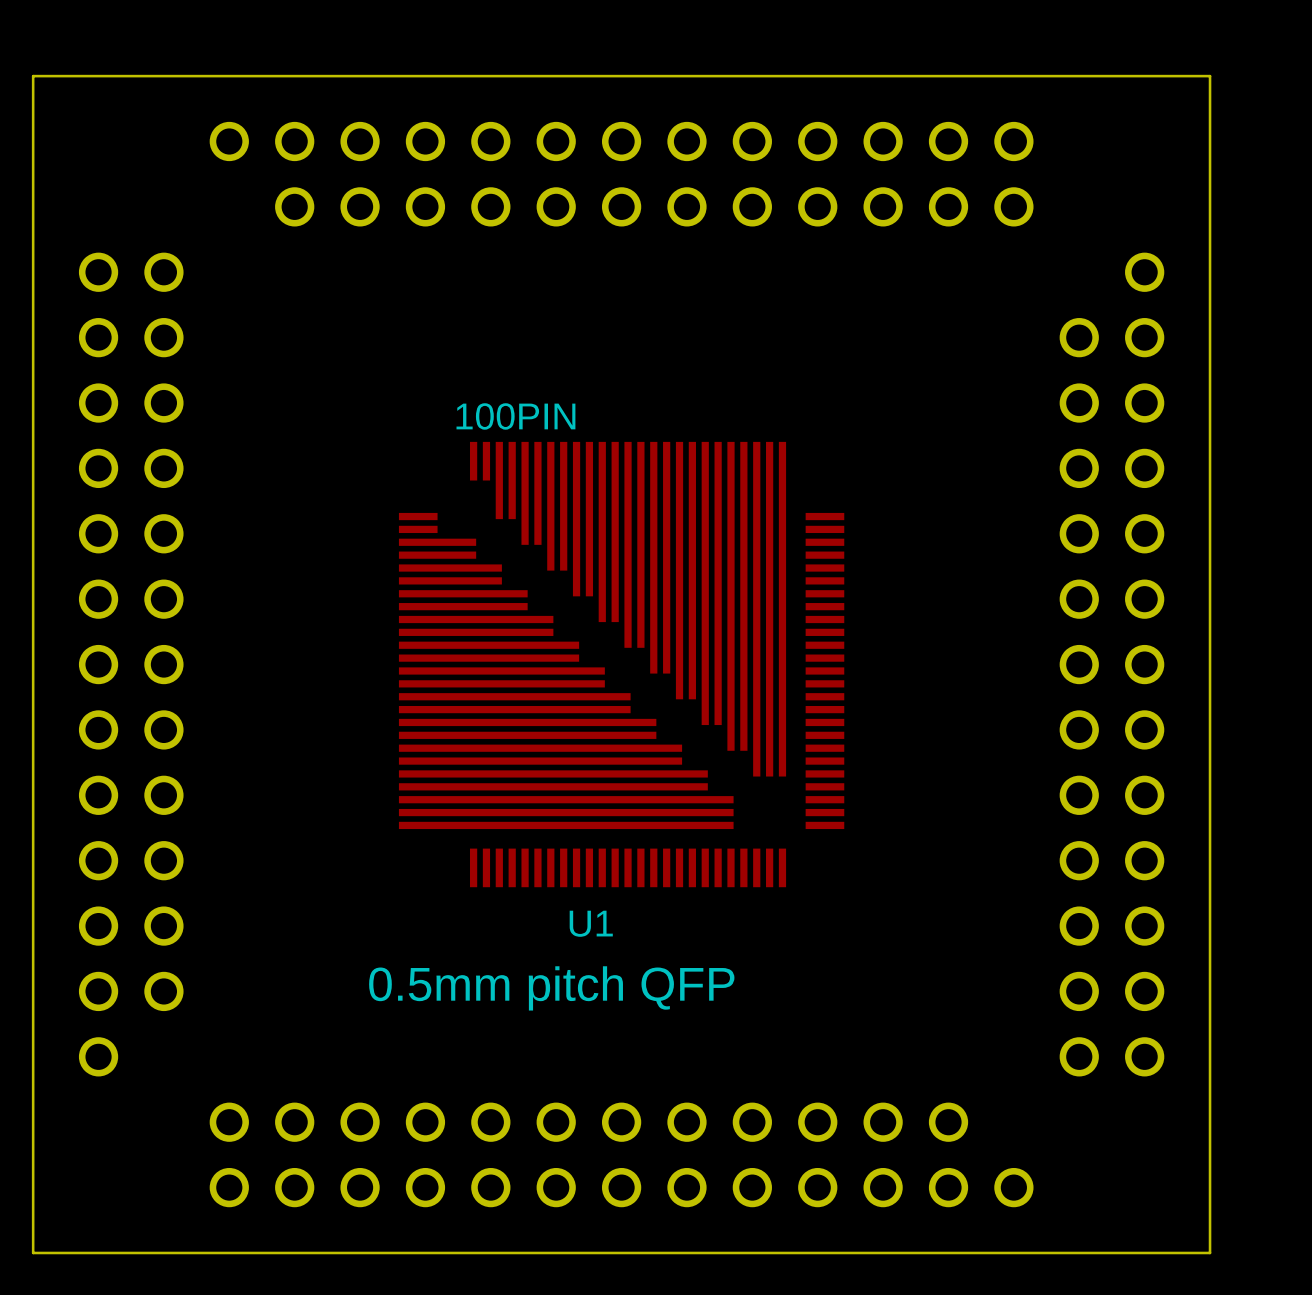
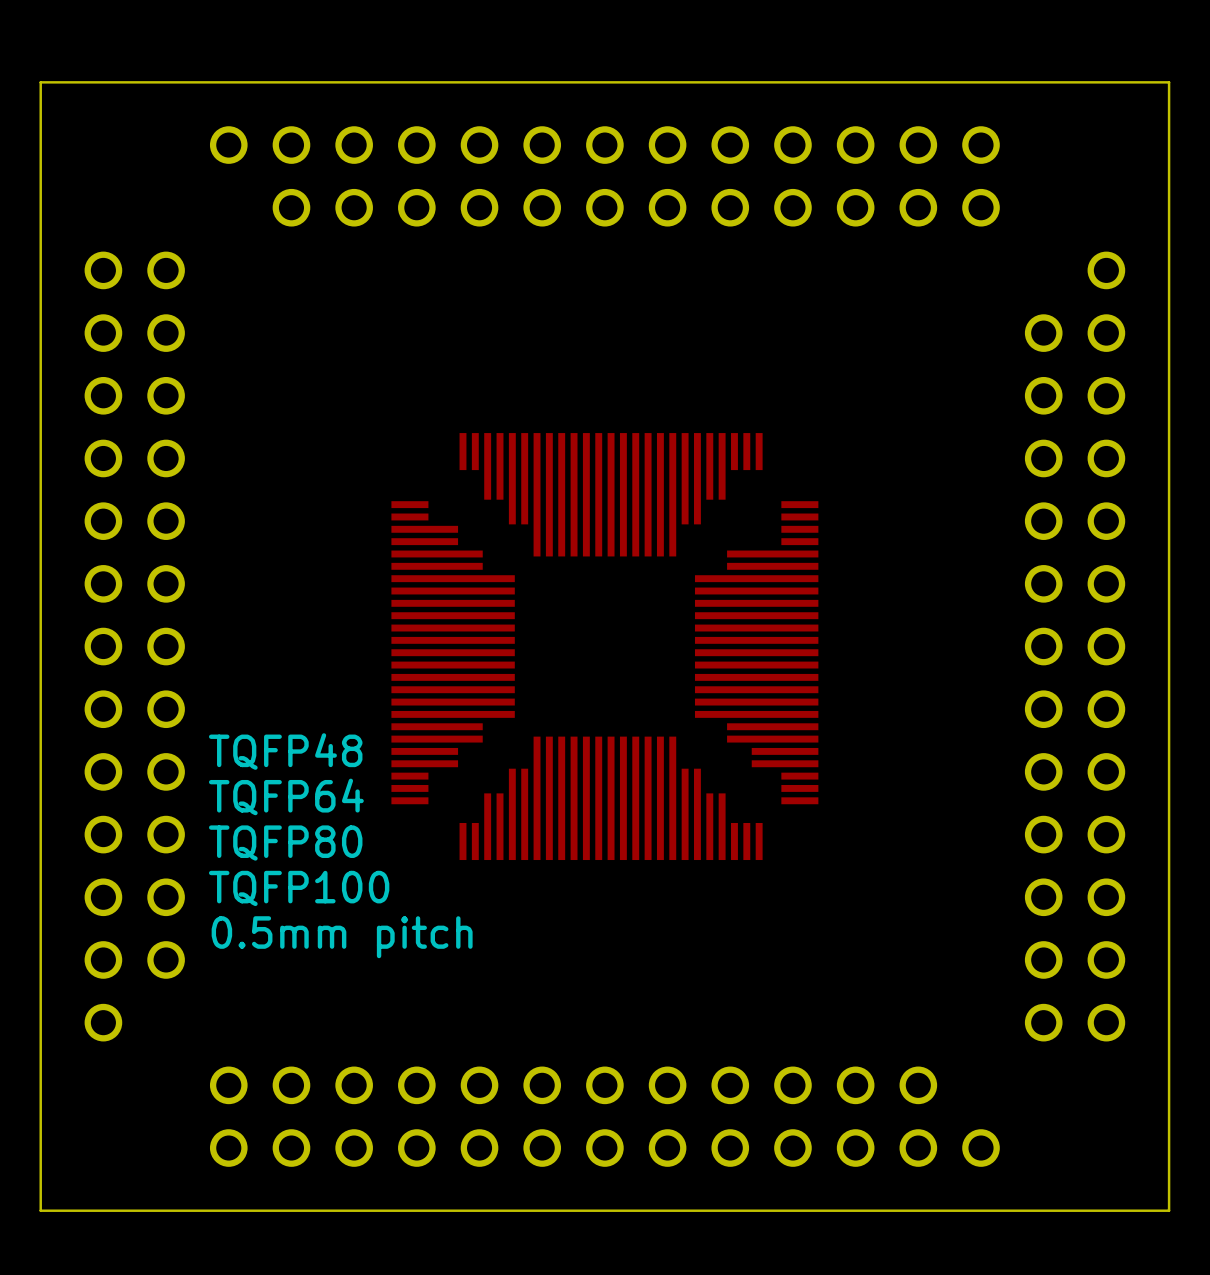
U1: 100PIN (621, 664) -> none
part: none -> (604, 646)
text: none -> TQFP48 (285, 751)
text: none -> TQFP64 (286, 796)
text: none -> TQFP80 (285, 843)
text: none -> TQFP100 (299, 888)
text: 0.5mm pitch QFP (551, 988) -> 0.5mm pitch (342, 937)

